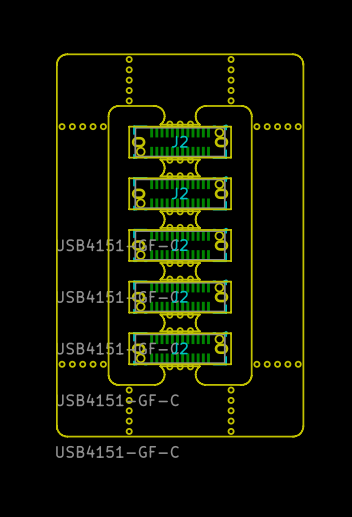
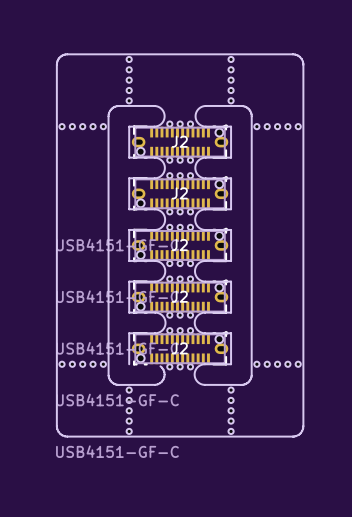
board edge: (205, 105) (199, 108) (196, 112) (195, 118) (199, 124) (160, 124) (164, 118) (163, 112) (160, 108) (154, 105) -> (129, 126) (155, 126) (160, 124) (164, 118) (163, 112) (160, 108) (154, 105)
board edge: (231, 126) (129, 126) -> (231, 126) (204, 126) (199, 124) (195, 118) (196, 112) (200, 107) (205, 105)
board edge: (231, 157) (129, 157) -> (129, 178) (157, 177) (162, 174) (164, 168) (162, 161) (157, 158) (129, 157)
board edge: (160, 159) (164, 168) (160, 176) (199, 176) (195, 168) (199, 159) (160, 159) -> none
board edge: (129, 178) (231, 178) (231, 209) (129, 209) -> (129, 229) (157, 229) (162, 226) (165, 219) (163, 213) (157, 209) (129, 209)
board edge: (160, 211) (164, 219) (160, 227) (199, 227) (195, 219) (199, 211) (160, 211) -> none
board edge: (231, 229) (129, 229) -> (231, 229) (203, 229) (197, 226) (195, 219) (197, 212) (203, 209) (231, 209) (231, 178) (201, 177) (195, 170) (196, 162) (204, 157) (231, 157)
board edge: (231, 260) (129, 260) -> (231, 260) (202, 261) (197, 264) (194, 271) (197, 277) (202, 281) (231, 281)
board edge: (160, 262) (164, 271) (160, 279) (199, 279) (195, 271) (199, 262) (160, 262) -> none
board edge: (231, 281) (129, 281) -> (129, 260) (157, 261) (162, 264) (165, 271) (162, 278) (157, 281) (129, 281)
board edge: (231, 312) (129, 312) -> (231, 312) (202, 312) (196, 316) (194, 322) (196, 329) (202, 332) (231, 333)
board edge: (160, 314) (164, 322) (160, 331) (199, 331) (195, 322) (199, 314) (160, 314) -> none
board edge: (231, 333) (129, 333) -> (129, 312) (157, 312) (163, 316) (165, 322) (163, 329) (157, 332) (129, 333)
board edge: (231, 364) (129, 364) -> none
board edge: (160, 366) (199, 366) (195, 372) (195, 377) (198, 381) (204, 384) -> (231, 364) (203, 364) (198, 366) (194, 372) (195, 378) (199, 383) (204, 384)

